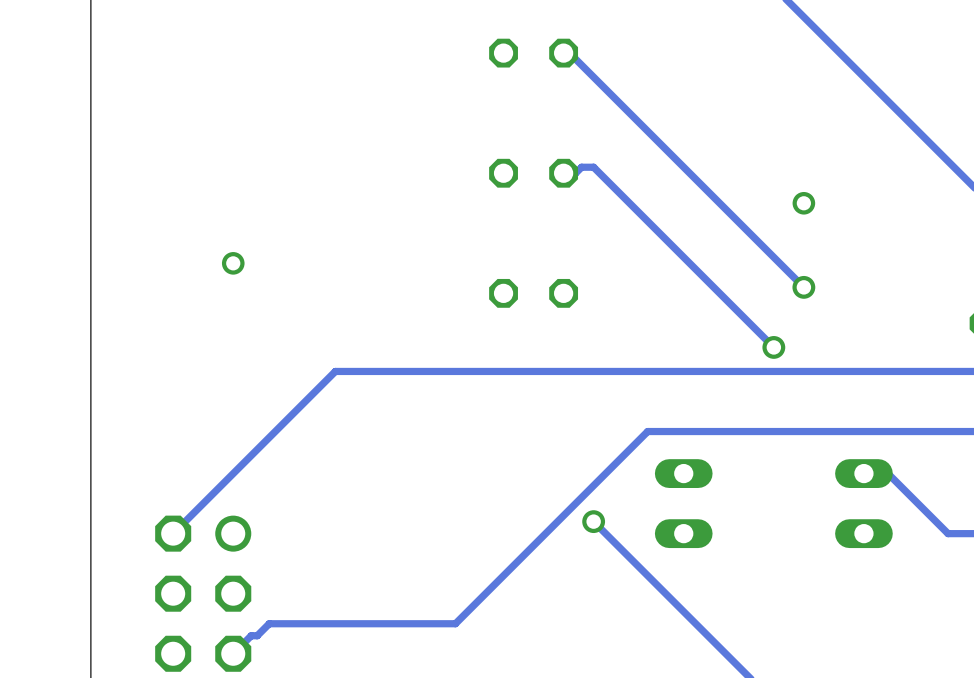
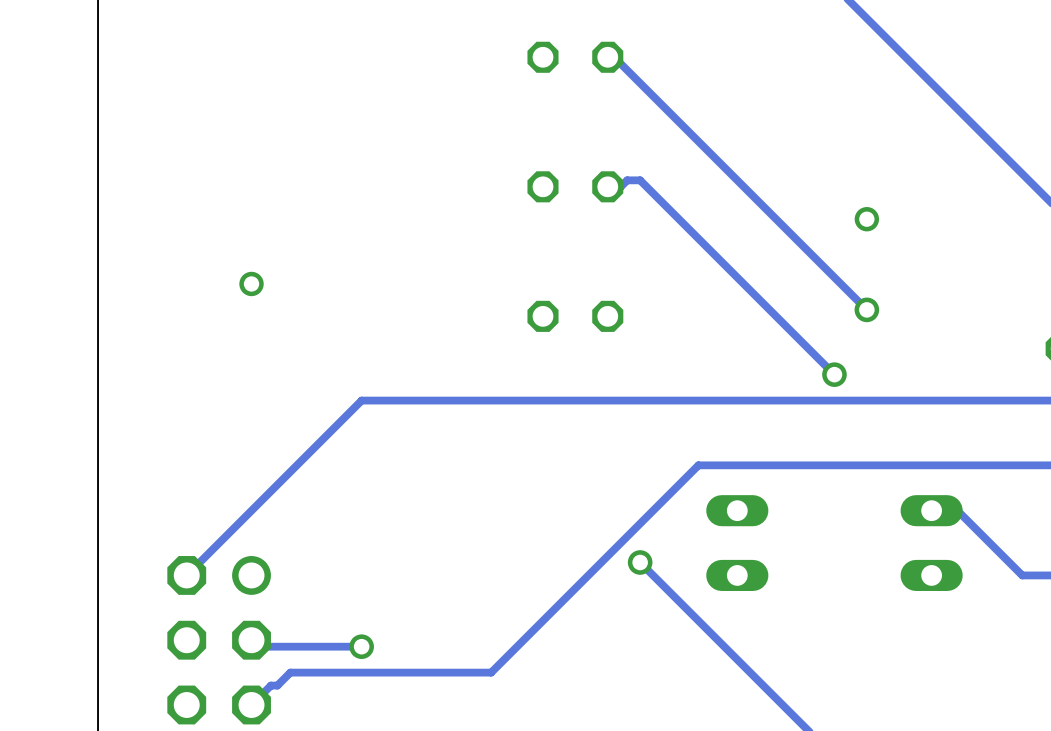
track: none -> (251, 640) (258, 646) (361, 646)
via: none -> (361, 646)

